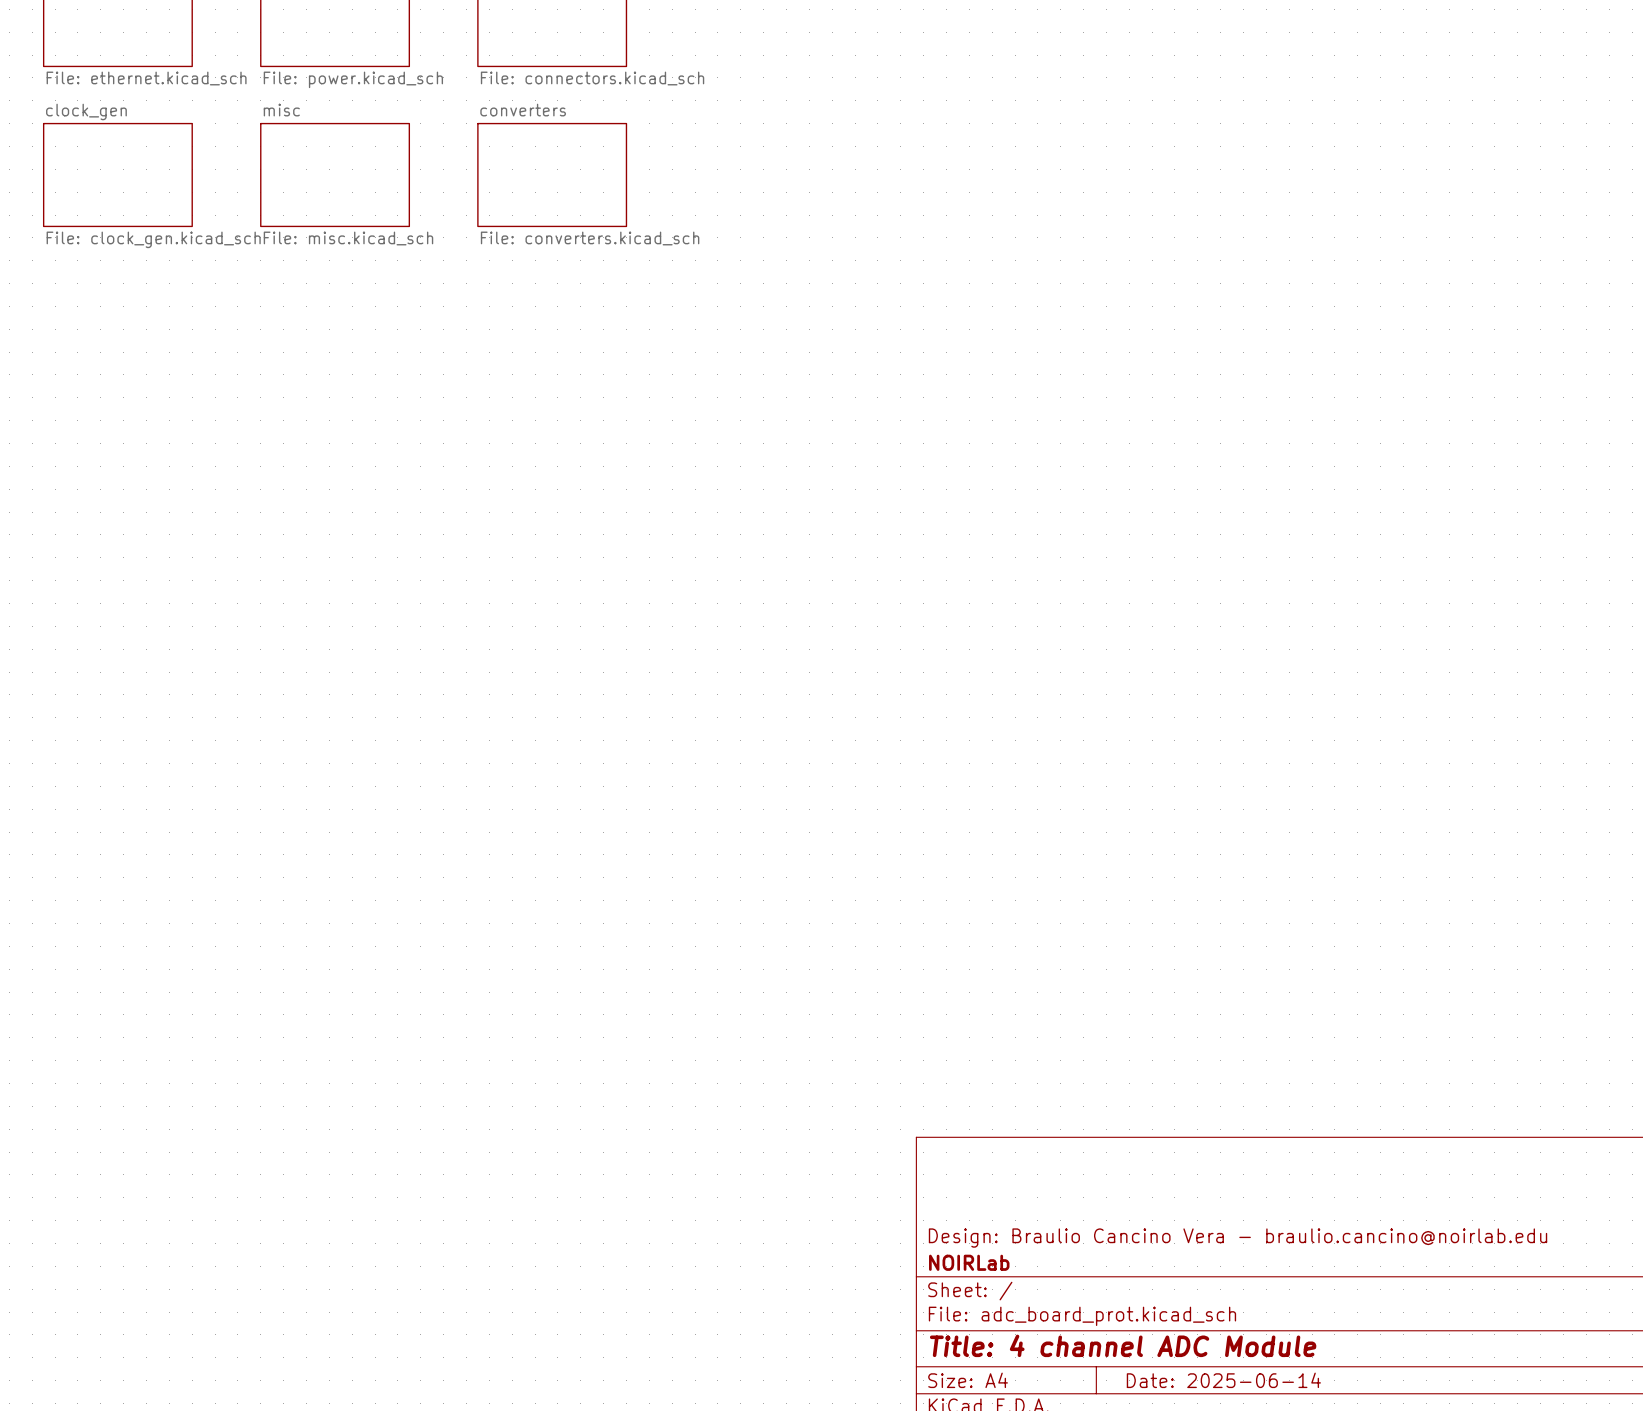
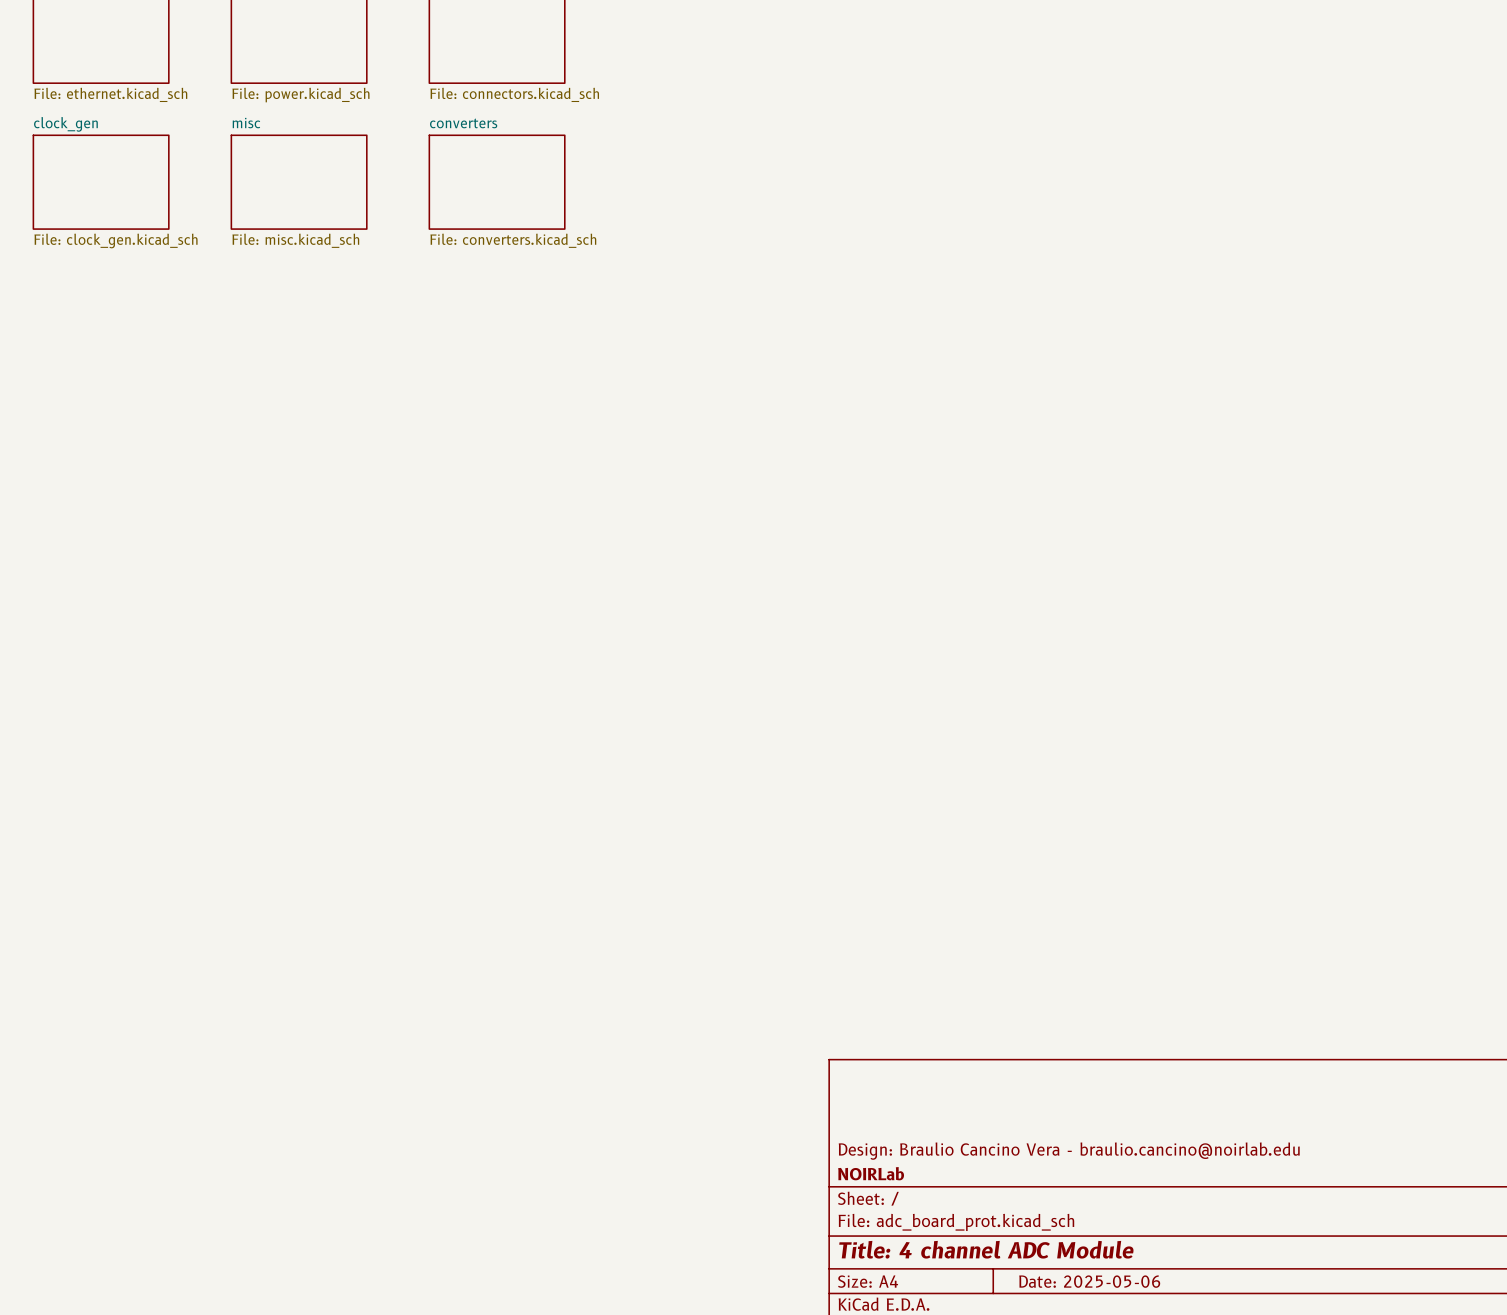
title block: Date: 2025-06-14 (1223, 1380) -> Date: 2025-05-06 (1089, 1281)

